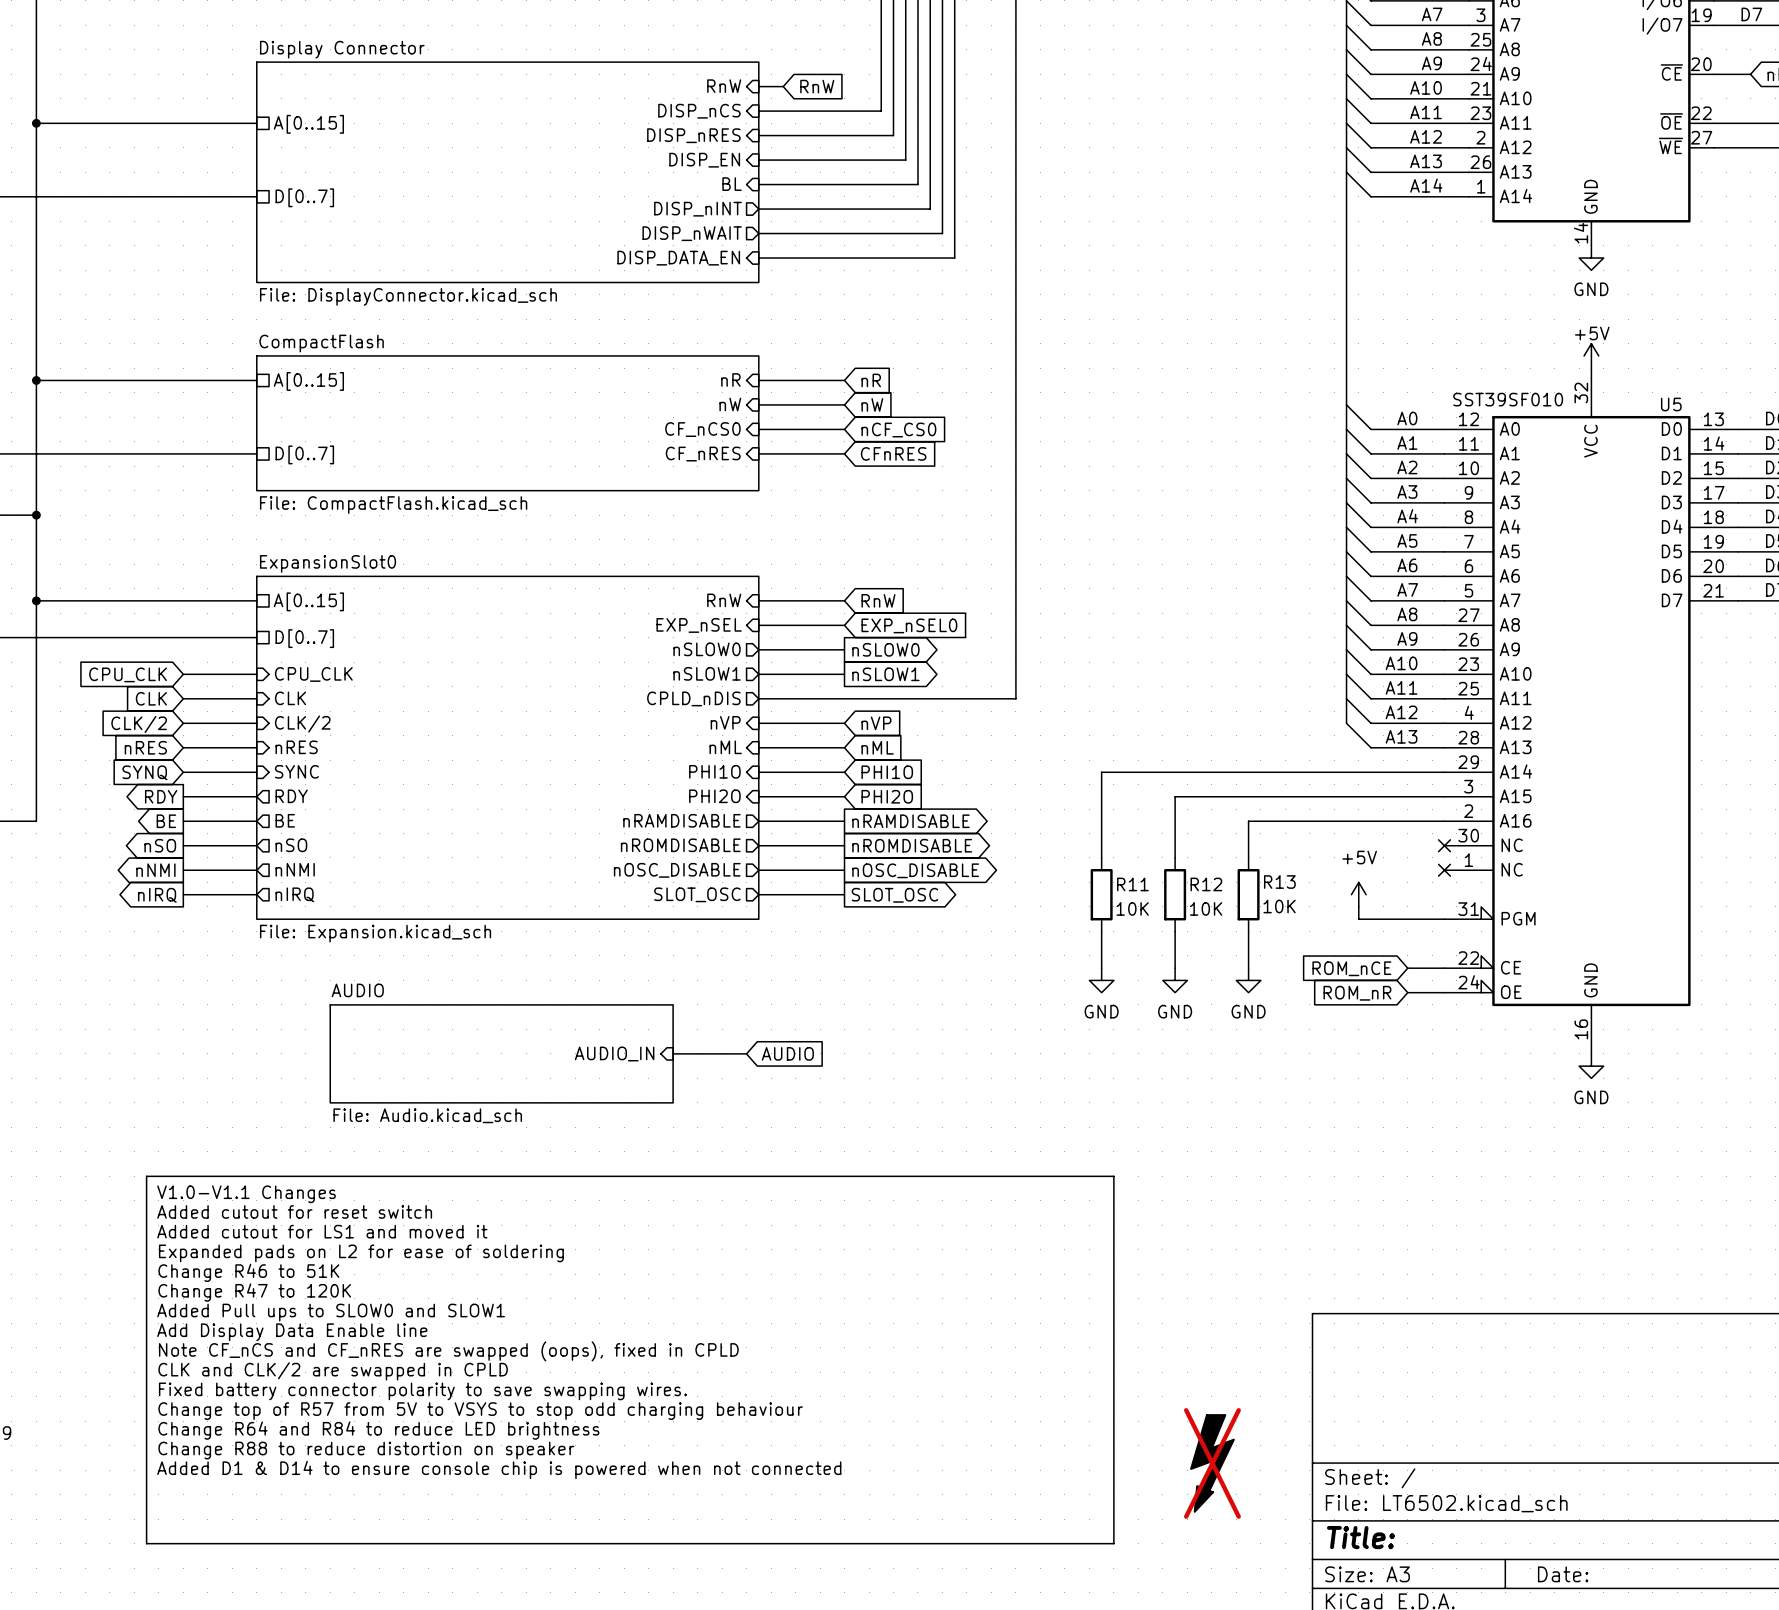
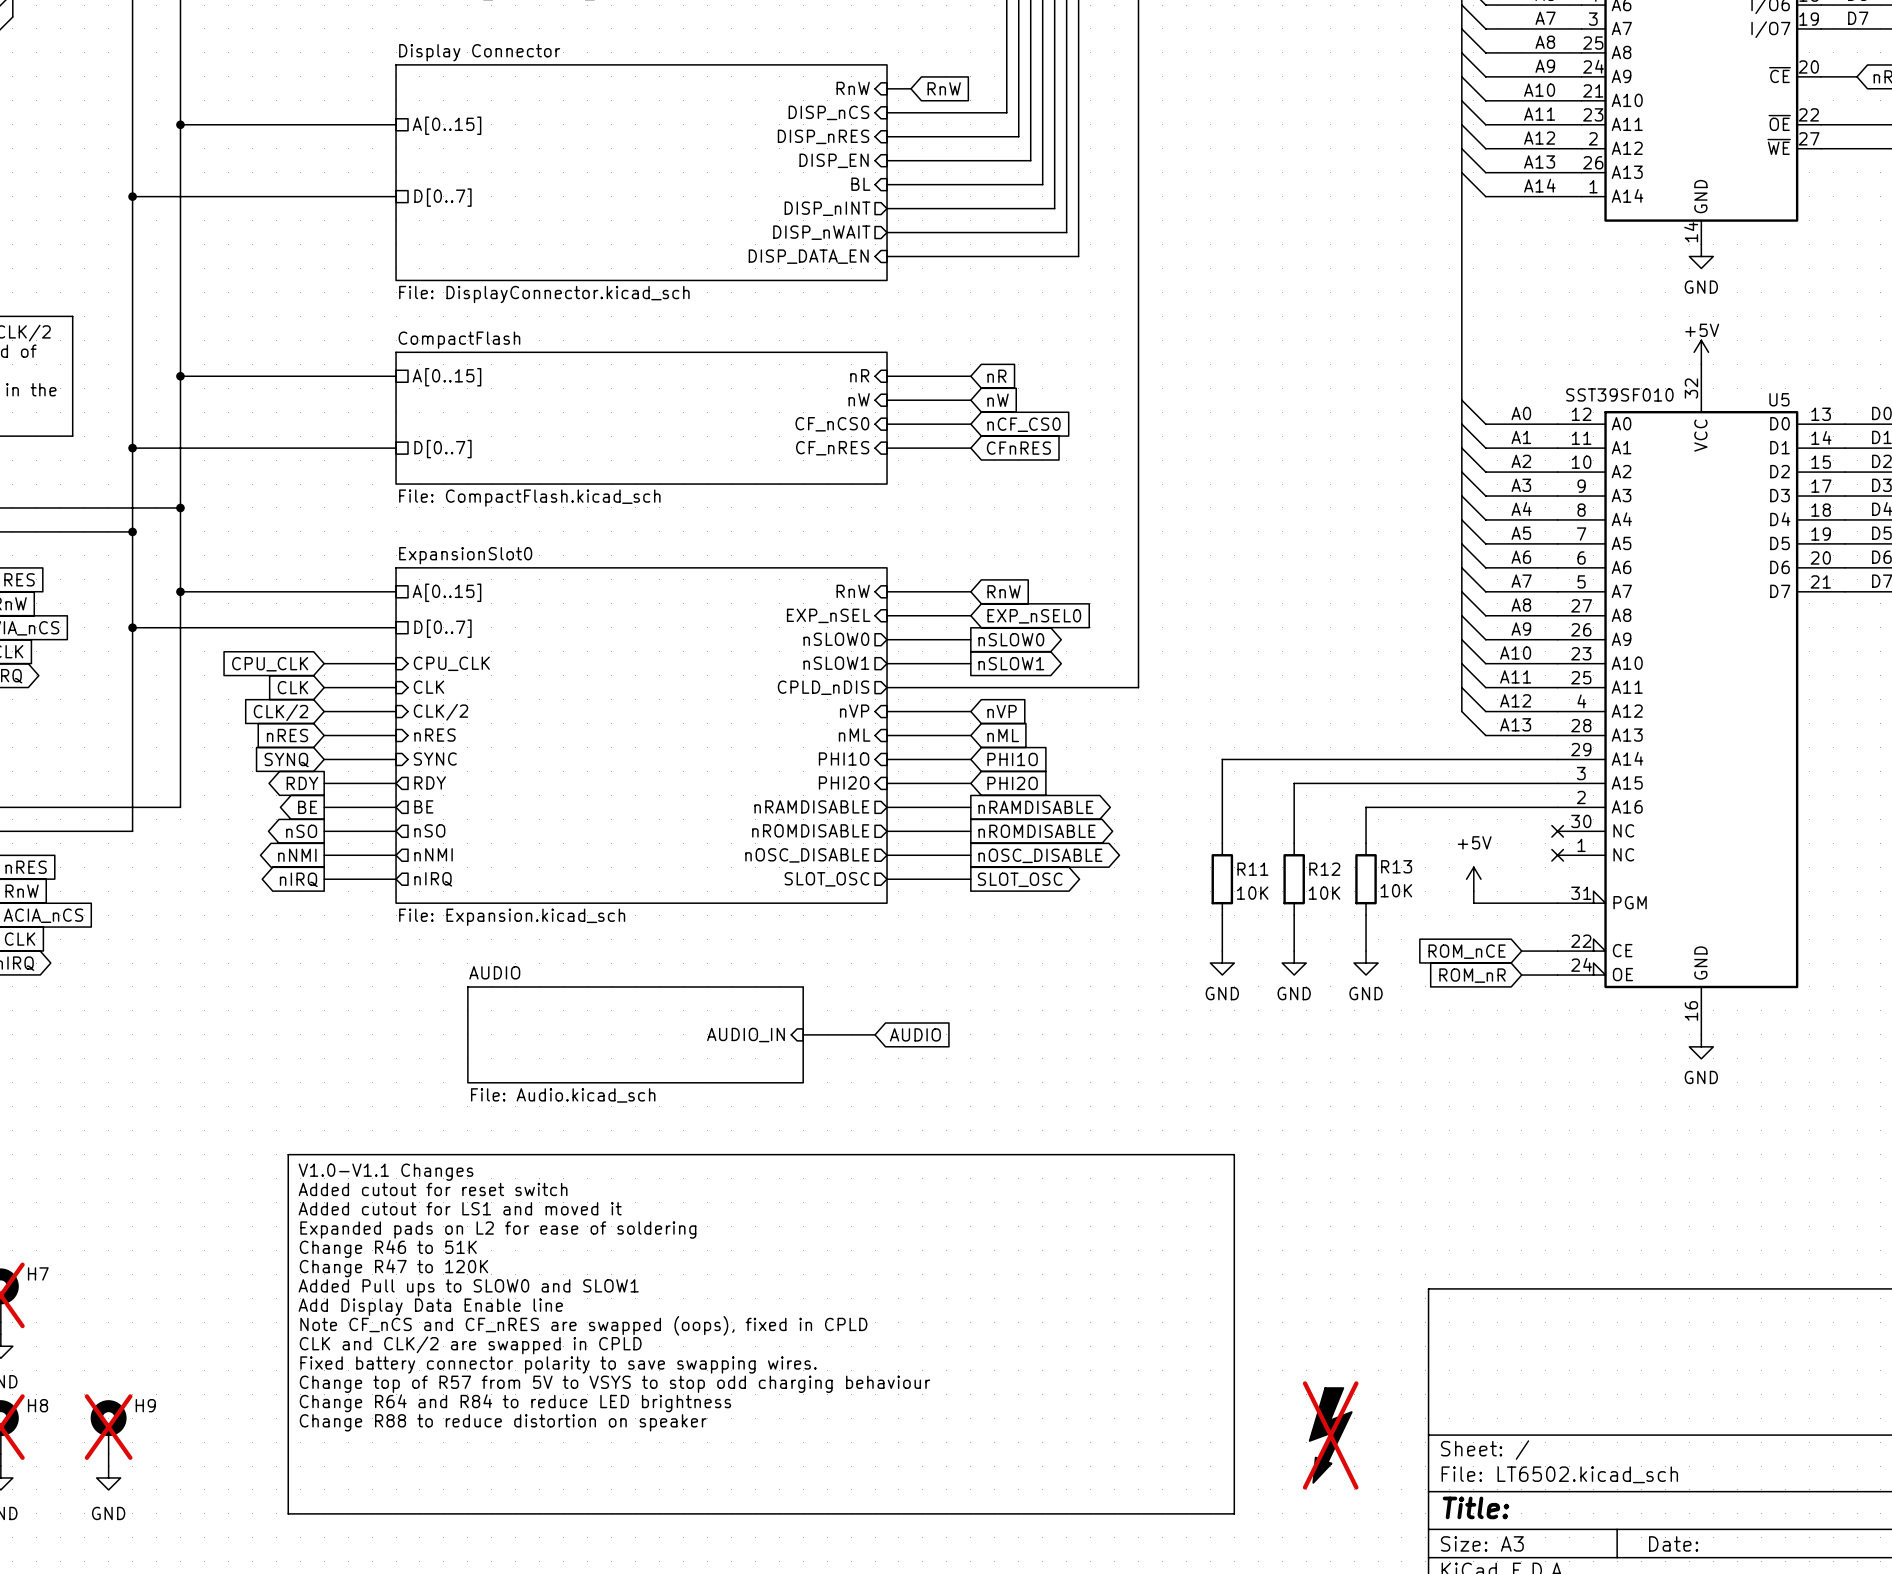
text: Added D1 & D14 to ensure console chip is powered when not connected (499, 1469) -> none

